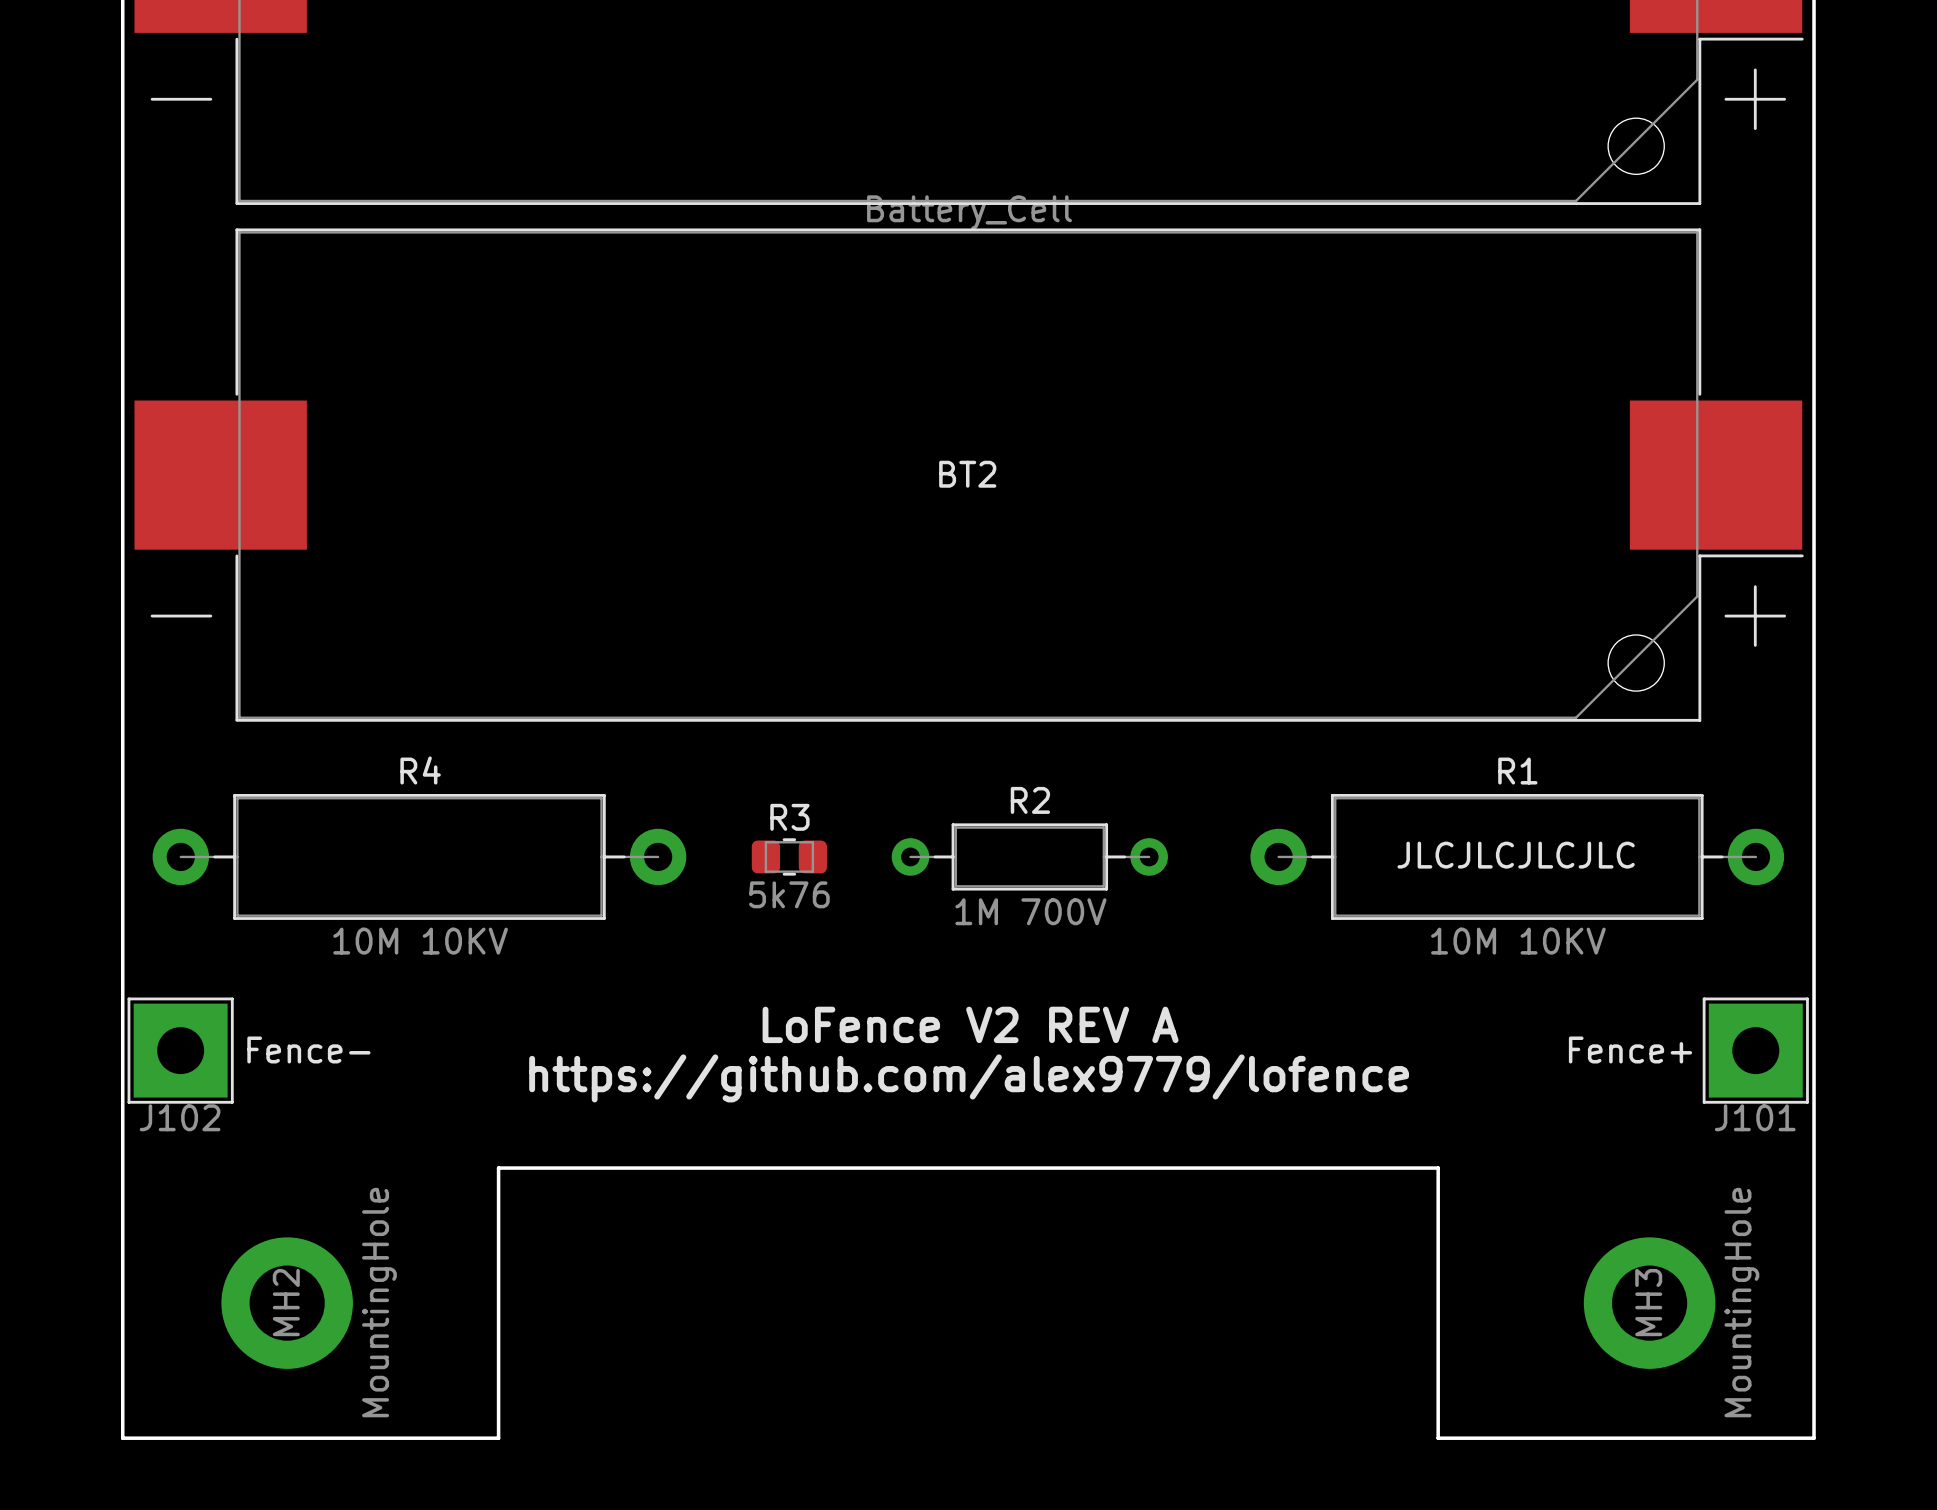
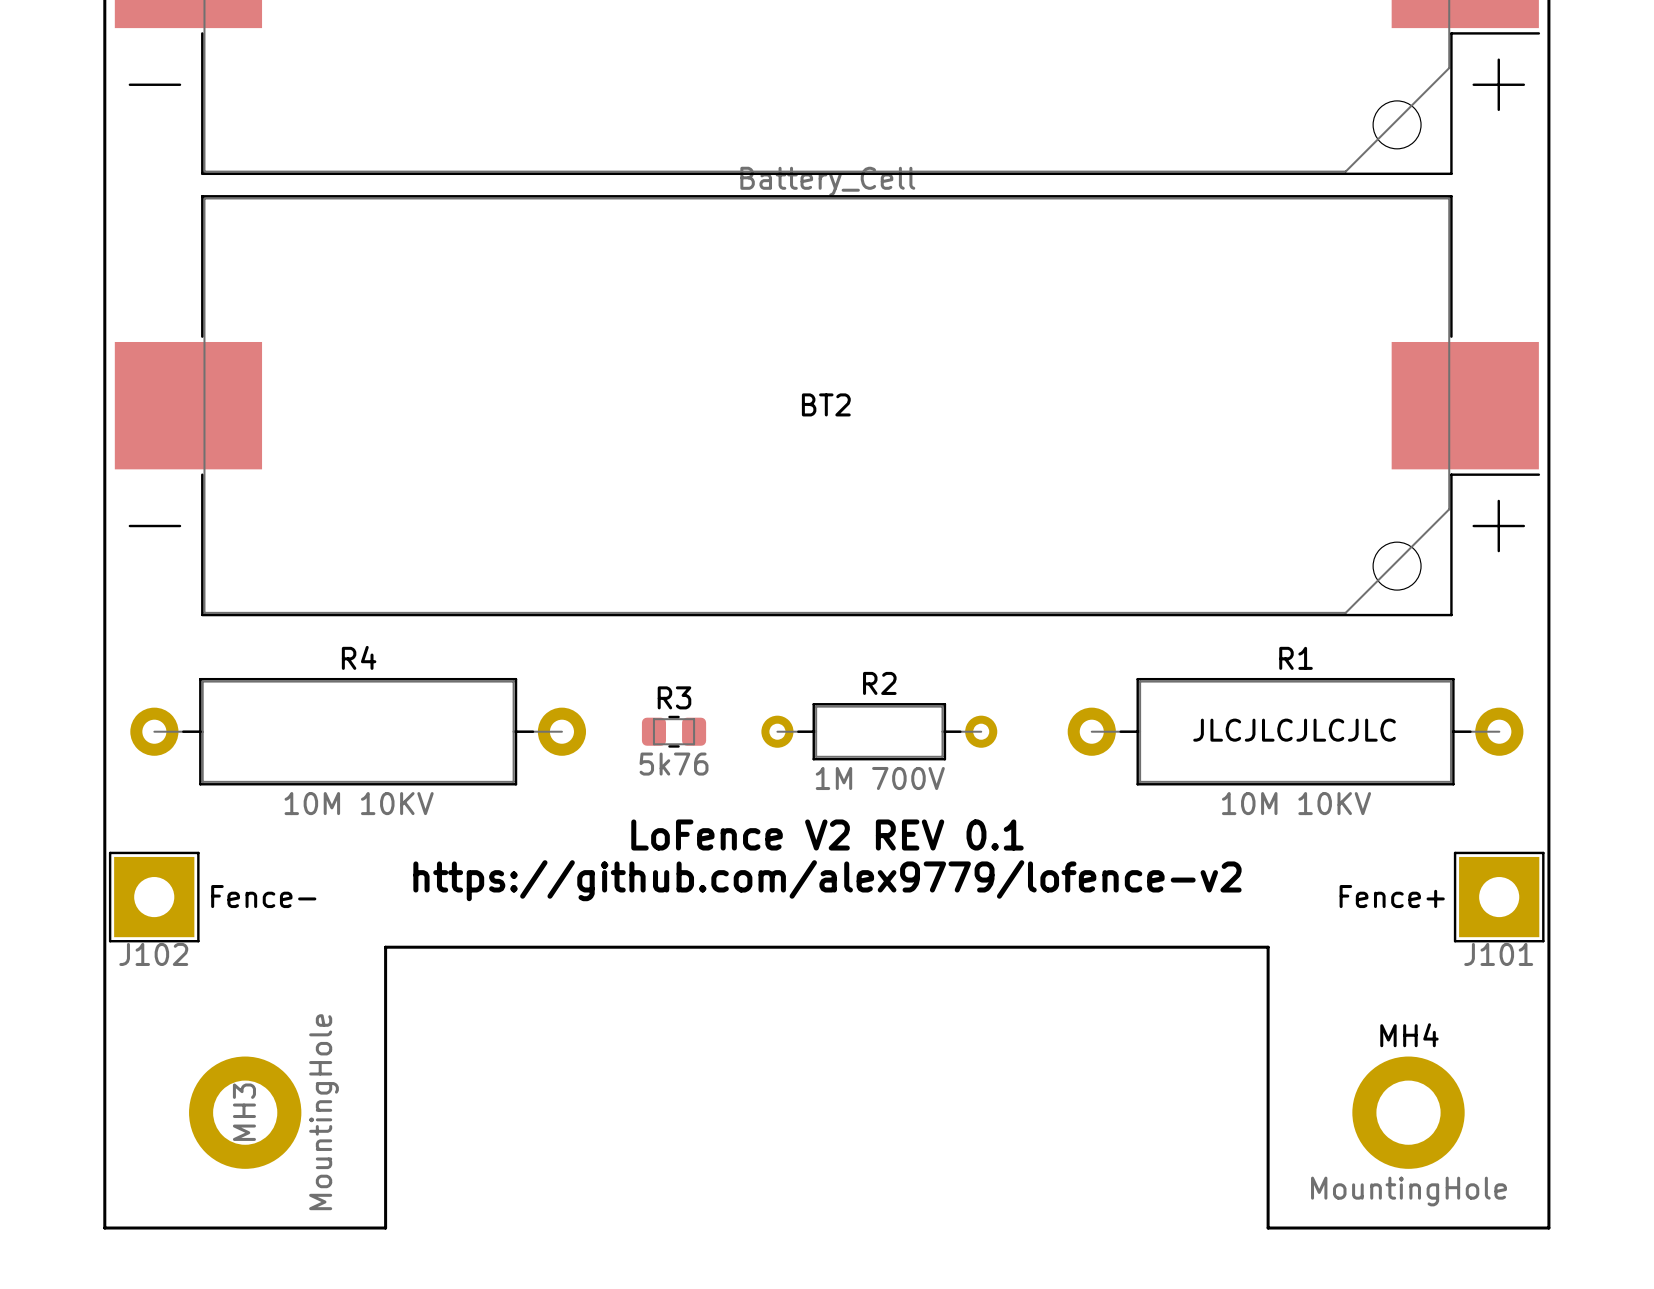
text: none -> LoFence V2 REV 0.1 (827, 834)
text: LoFence V2 REV A (970, 1024) -> https://github.com/alex9779/lofence-v2 (827, 880)
text: https://github.com/alex9779/lofence (969, 1078) -> none
MH2 name: MH2 (286, 1302) -> MH3 (244, 1112)
MH3 name: MH3 (1648, 1302) -> MH4 (1409, 1035)
MH3 value rotation: 0° (1741, 1302) -> 90° clockwise (1408, 1191)
board edge: (451, 1438) (498, 1438) (498, 1168) (1438, 1168) (1438, 1438) (1485, 1438) -> (385, 1228) (385, 947) (1268, 947) (1268, 1228)

